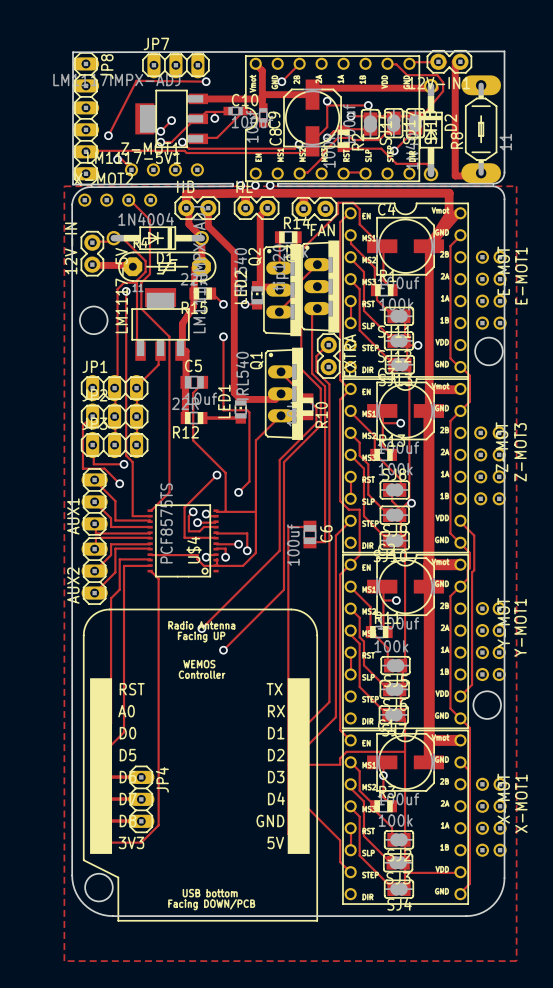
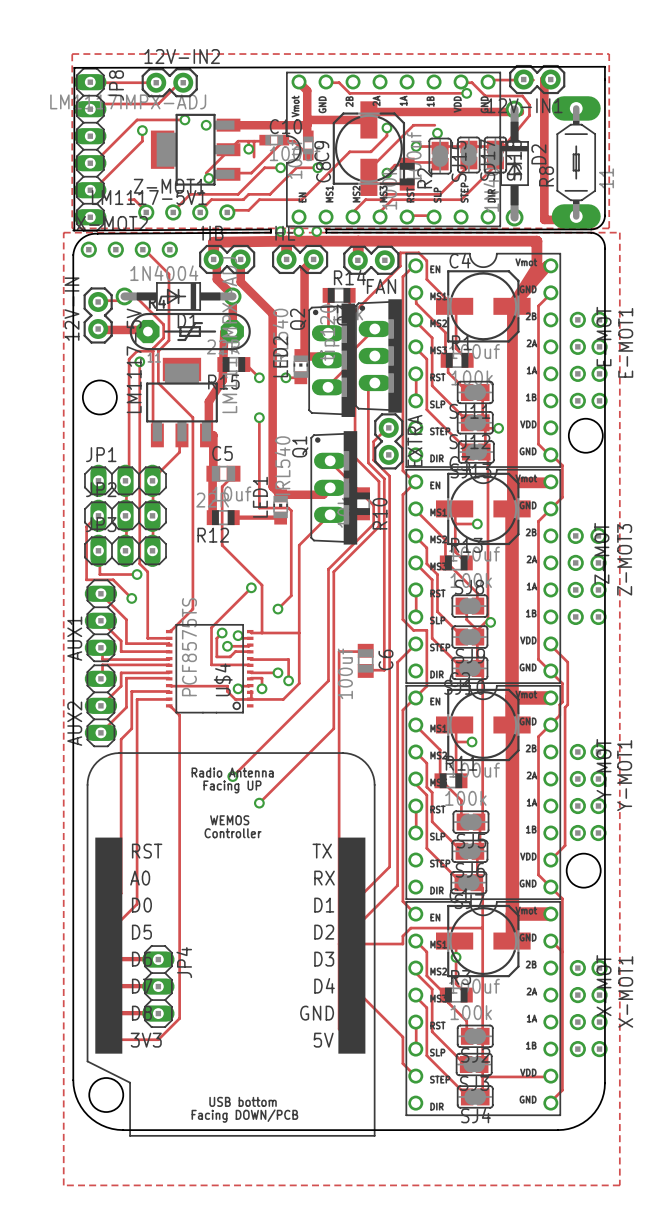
zone outline: none -> (72, 54) (609, 54) (609, 228) (72, 228) (72, 54)
track: none -> (324, 78) (328, 82) (339, 82) (349, 93) (466, 93)
track: none -> (90, 82) (156, 82)
track: (299, 63) (281, 81) -> none
12V-IN2: none -> (169, 82)
track: none -> (183, 82) (179, 82) (158, 103) (94, 103) (90, 109)
JP7: (175, 65) -> none
via: none -> (466, 93)
track: (206, 81) (136, 80) (108, 135) -> none
via: (206, 81) -> none
via: (281, 81) -> none
track: none -> (184, 119) (137, 119) (94, 162) (90, 163)
via: none -> (184, 119)
via: none -> (206, 125)
track: none -> (142, 130) (142, 141) (94, 189) (90, 190)
via: none -> (142, 130)
track: (327, 105) (368, 105) -> none
track: (327, 107) (327, 127) (301, 153) (186, 153) (184, 150) (85, 151) -> (386, 135) (371, 151) (349, 151) (301, 199) (259, 199) (248, 210) (227, 210) (227, 212)
track: none -> (254, 141) (254, 157)
track: (171, 120) (160, 131) -> none
via: (171, 120) -> none
track: (197, 120) (193, 120) (171, 142) (160, 142) -> (227, 151) (206, 173)
track: (393, 129) (387, 131) (379, 140) (338, 137) (307, 172) (299, 173) -> (468, 163) (466, 167) (440, 194) (386, 194) (381, 199) (365, 199) (351, 213)
track: (415, 129) (394, 150) -> (495, 163) (493, 167) (461, 199) (392, 199) (378, 213)
via: (160, 131) -> none
track: none -> (280, 167) (264, 167) (238, 194) (190, 194) (173, 212)
via: none -> (280, 167)
track: none -> (317, 167) (296, 167) (270, 194) (248, 194) (243, 199) (211, 199) (200, 212)
via: none -> (317, 167)
via: (108, 135) -> none
via: (160, 142) -> none
track: (182, 142) (188, 148) (294, 148) (299, 144) -> none
via: (299, 144) -> none
track: (343, 147) (381, 148) (396, 163) (426, 163) (435, 172) (431, 174) -> (407, 184) (376, 183) (368, 177) (371, 167) (413, 125) (434, 125)
via: (394, 150) -> none
via: (117, 159) -> none

